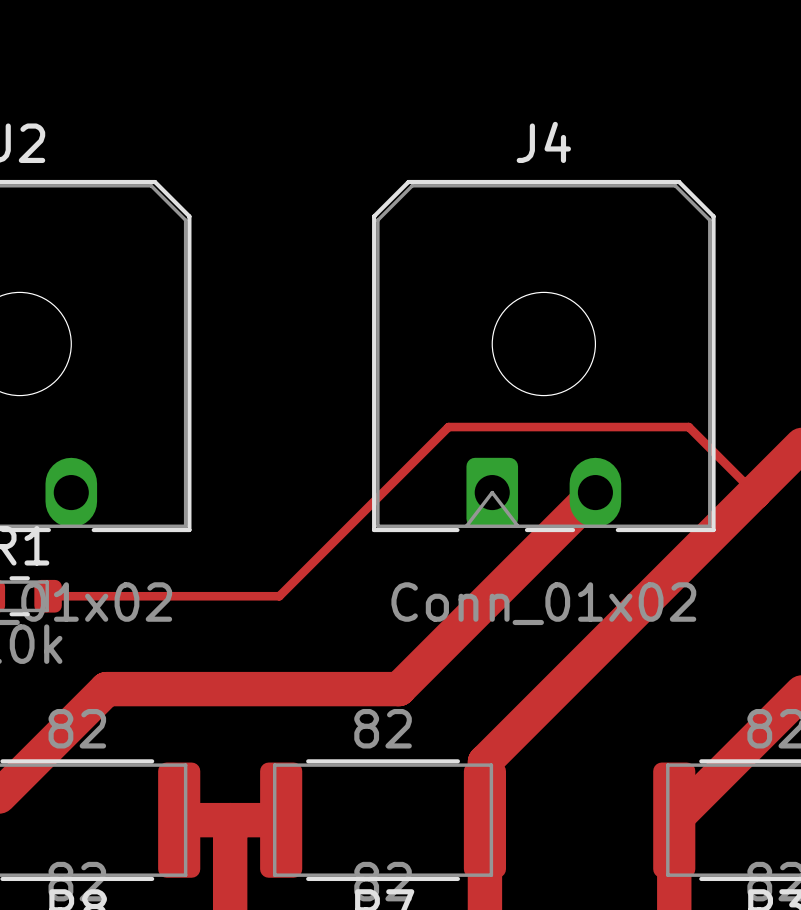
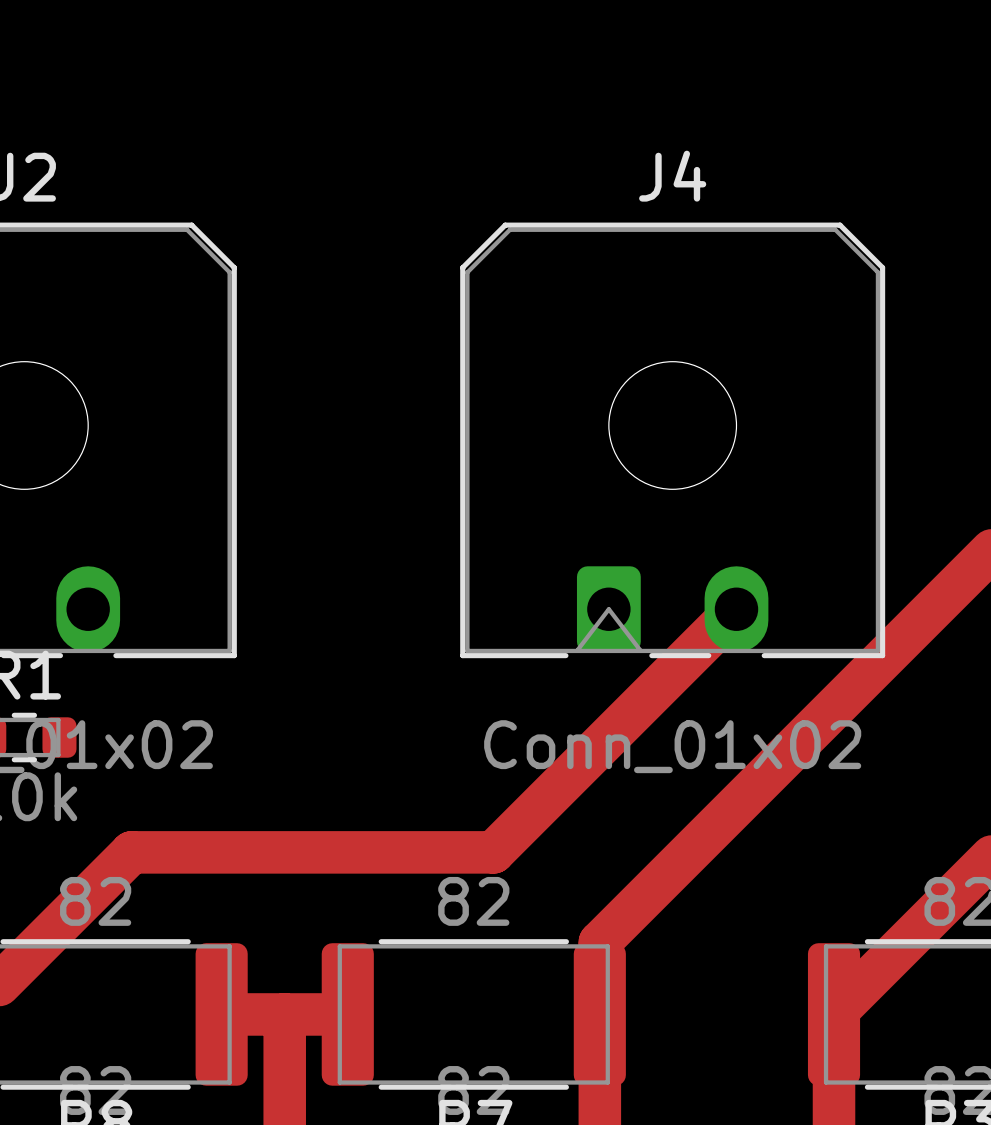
track: (754, 492) (688, 427) (448, 427) (279, 596) (48, 596) -> none

